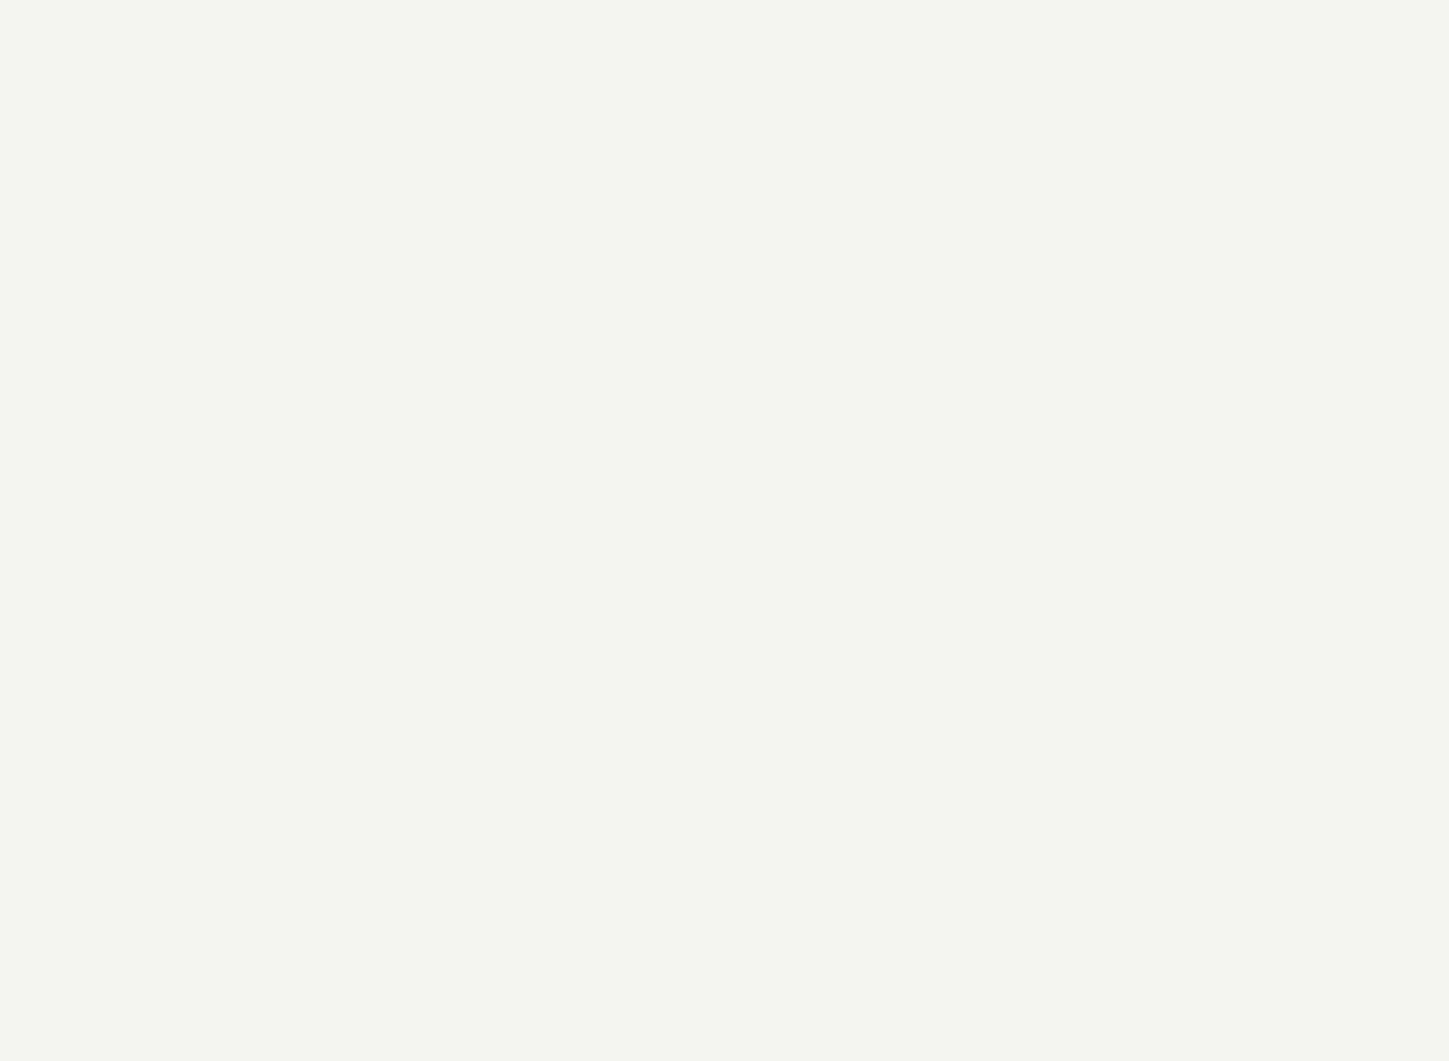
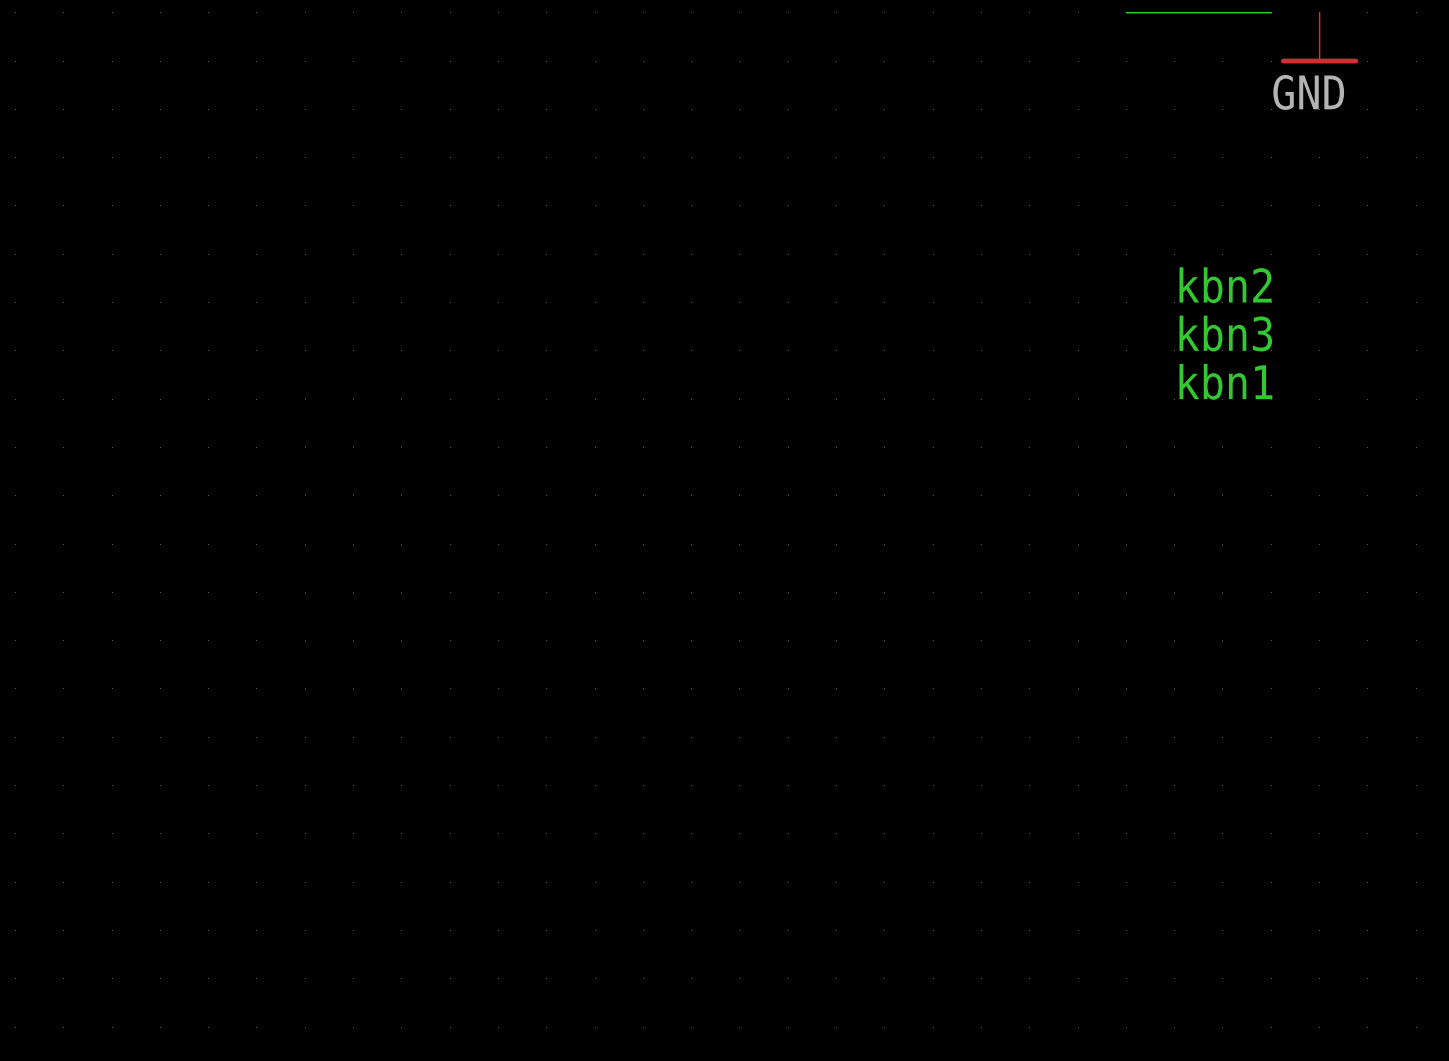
wire: none -> (1126, 12) (1271, 12)
power symbol: none -> GND (1319, 38)
text: none -> kbn2 (1225, 285)
text: none -> kbn3 (1225, 333)
text: none -> kbn1 (1225, 381)

